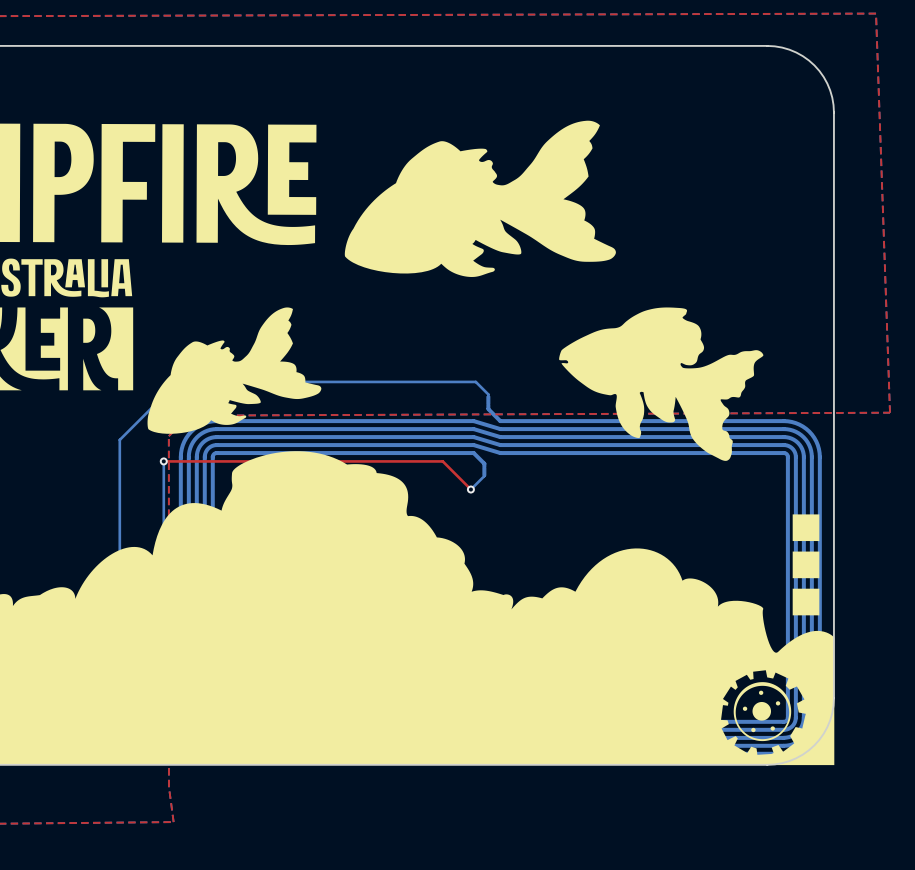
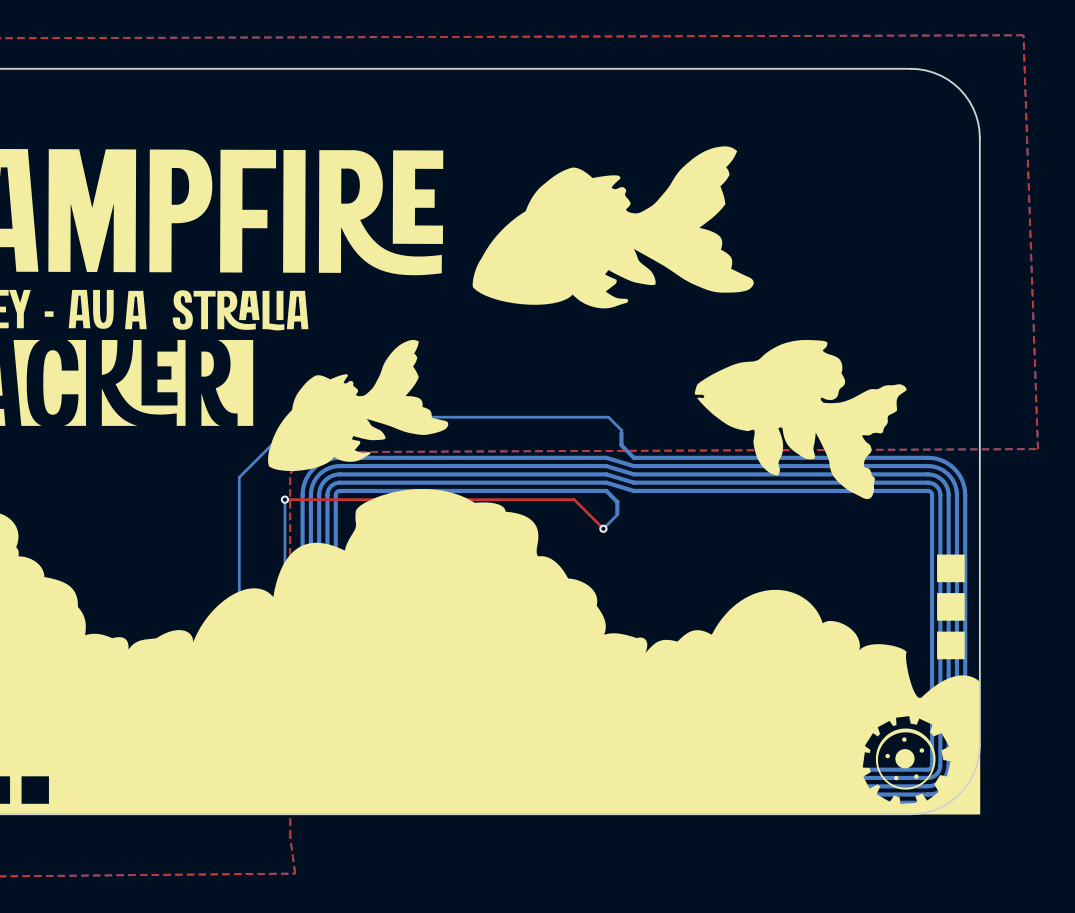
drawing: [111, 259, 133, 297] -> none
drawing: none -> [125, 290, 147, 330]
drawing: none -> [286, 290, 309, 330]
drawing position: (75, 273) -> (249, 305)
drawing position: (104, 273) -> (280, 305)
drawing position: (10, 277) -> (182, 310)
drawing position: (32, 277) -> (204, 310)
drawing position: (62, 277) -> (236, 310)
drawing position: (98, 278) -> (273, 310)

